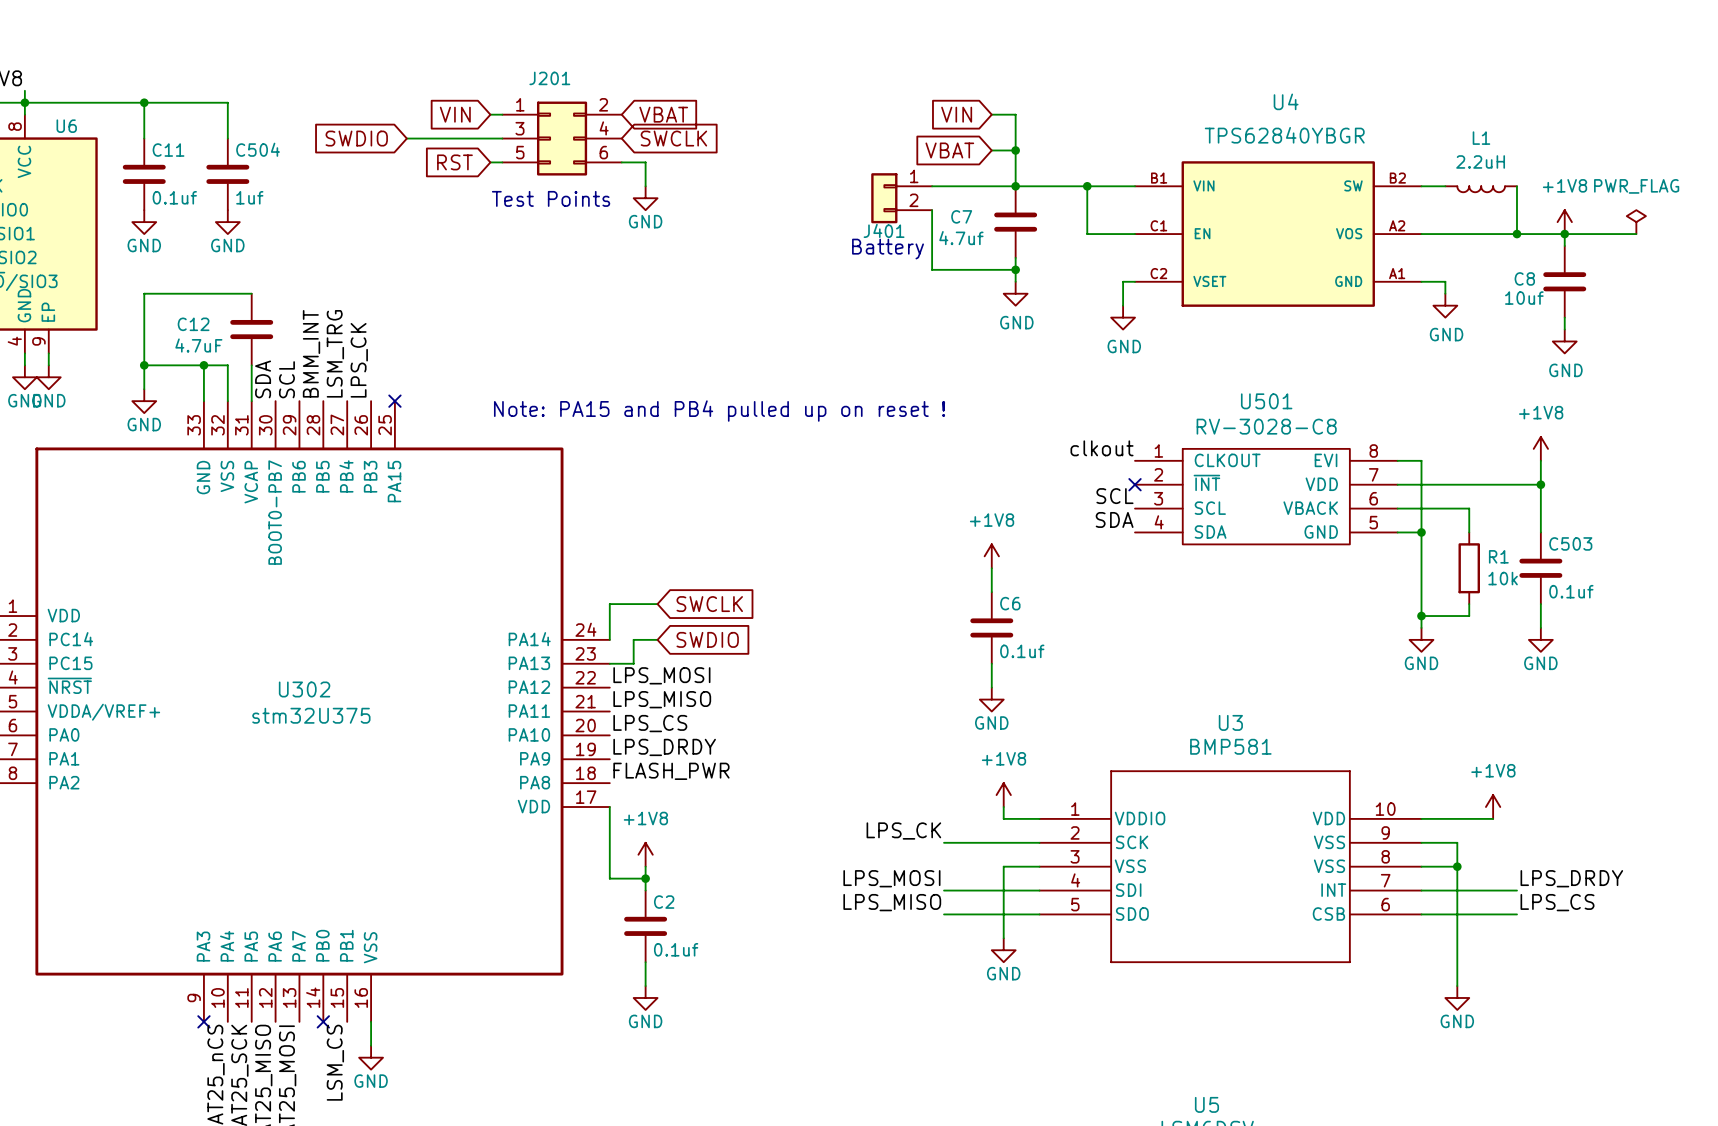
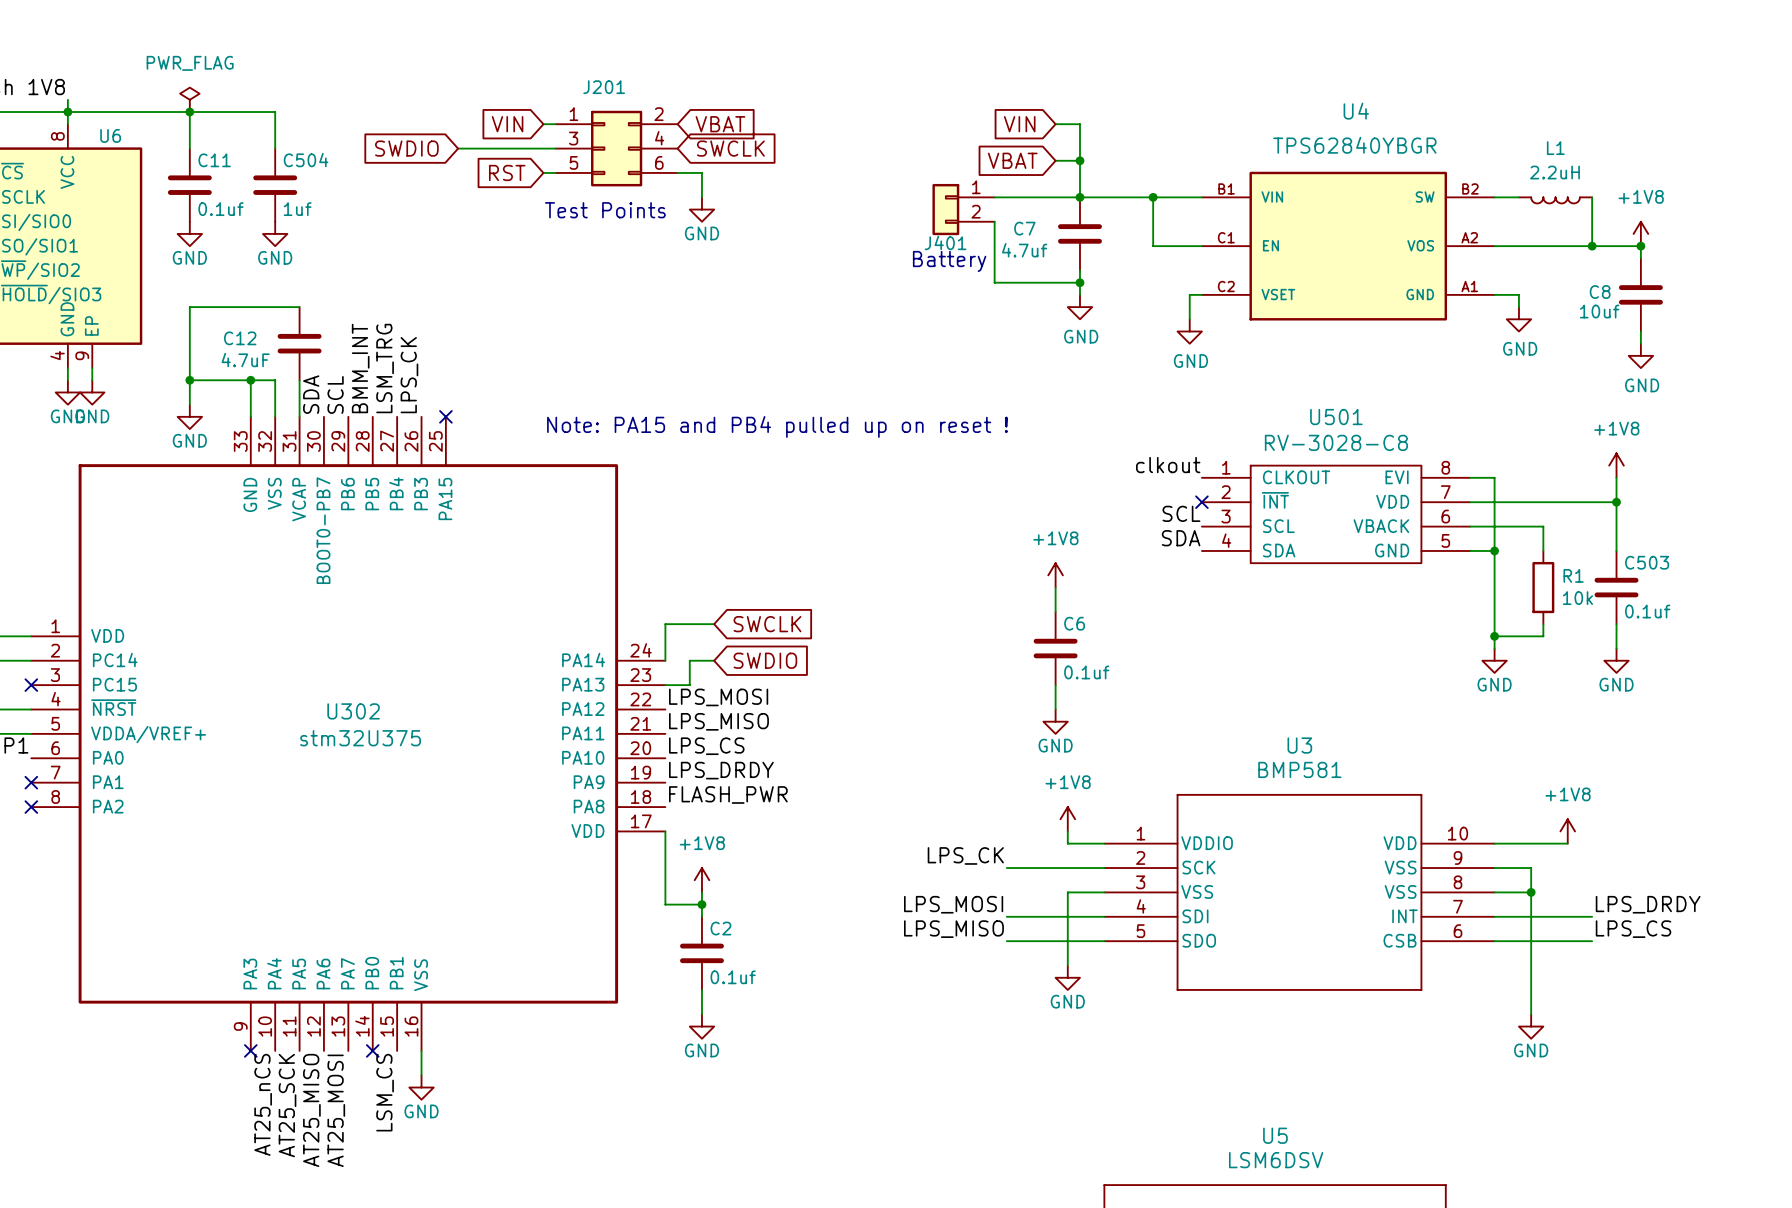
power symbol: none -> PWR_FLAG (189, 99)
power symbol: PWR_FLAG (1636, 222) -> none
wire: (1564, 234) (1636, 234) -> none

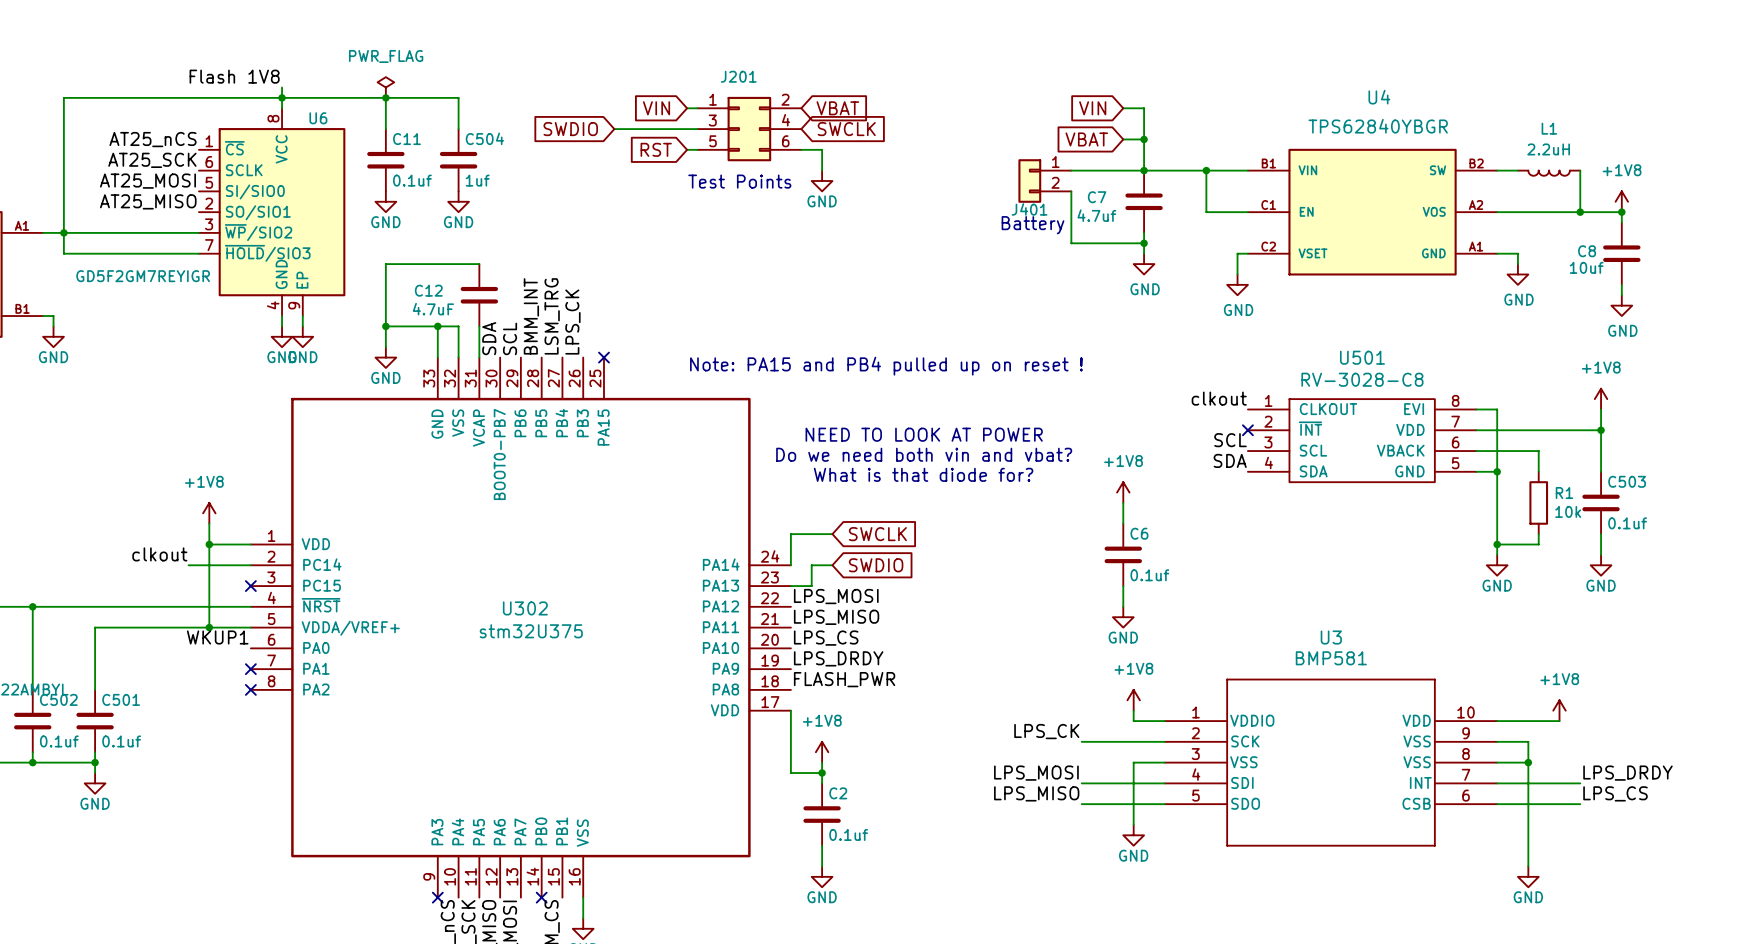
text: none -> NEED TO LOOK AT POWER (924, 434)
text: none -> Do we need both vin and vbat? (924, 454)
text: none -> What is that diode for? (923, 474)

